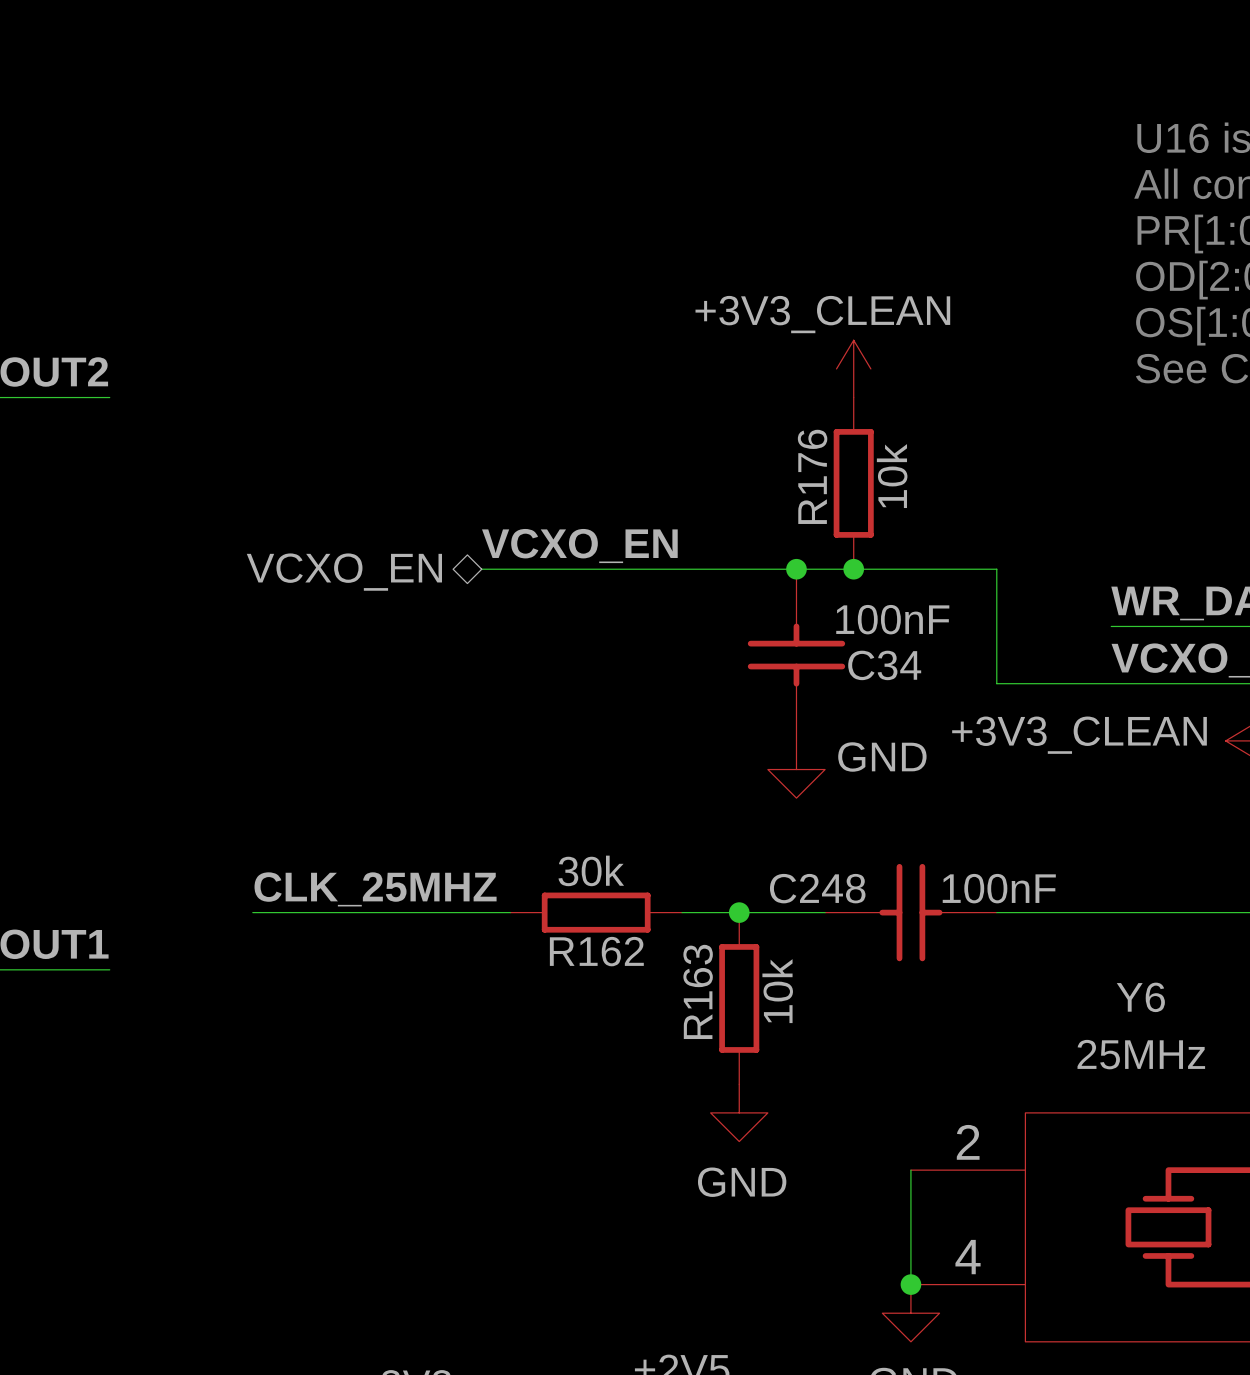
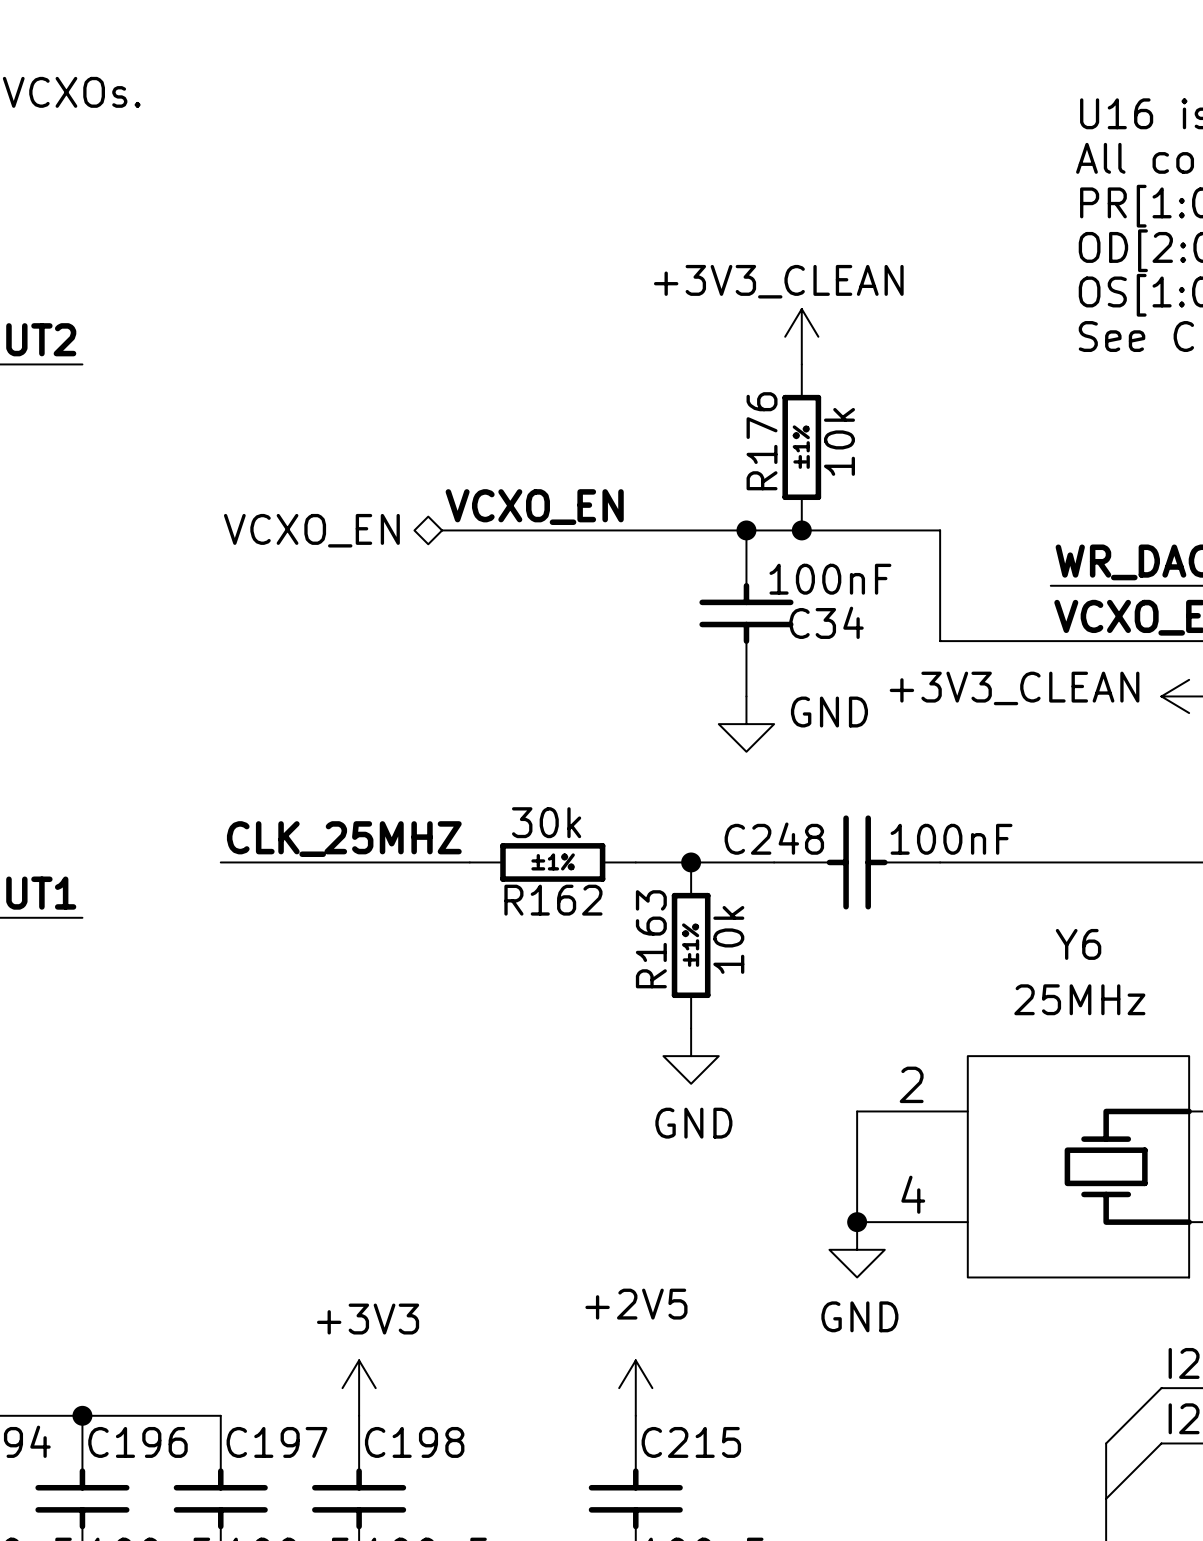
R176 text: none -> ±1% (801, 447)
R162 text: none -> ±1% (553, 861)
R163 text: none -> ±1% (690, 945)

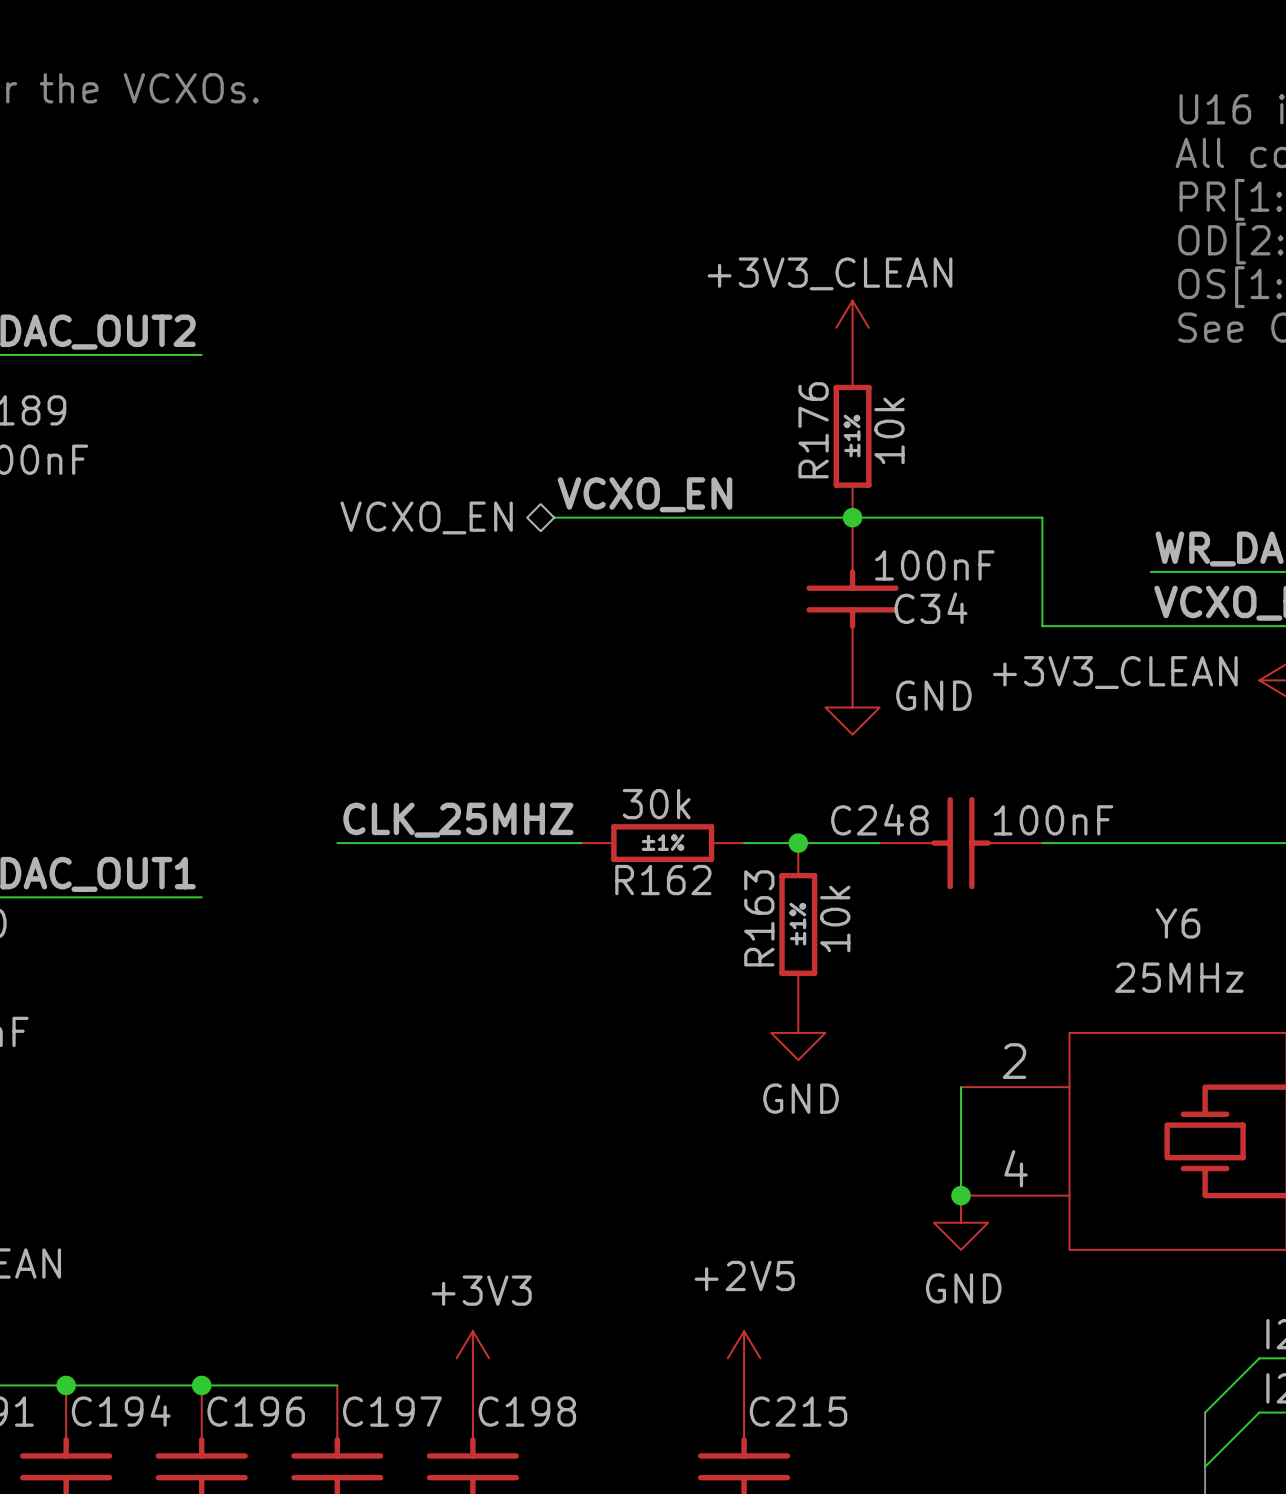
power symbol position: +3V3_CLEAN (801, 336) -> +3V3_CLEAN (852, 327)
R176 position: (801, 447) -> (852, 436)
junction: (801, 530) -> none

